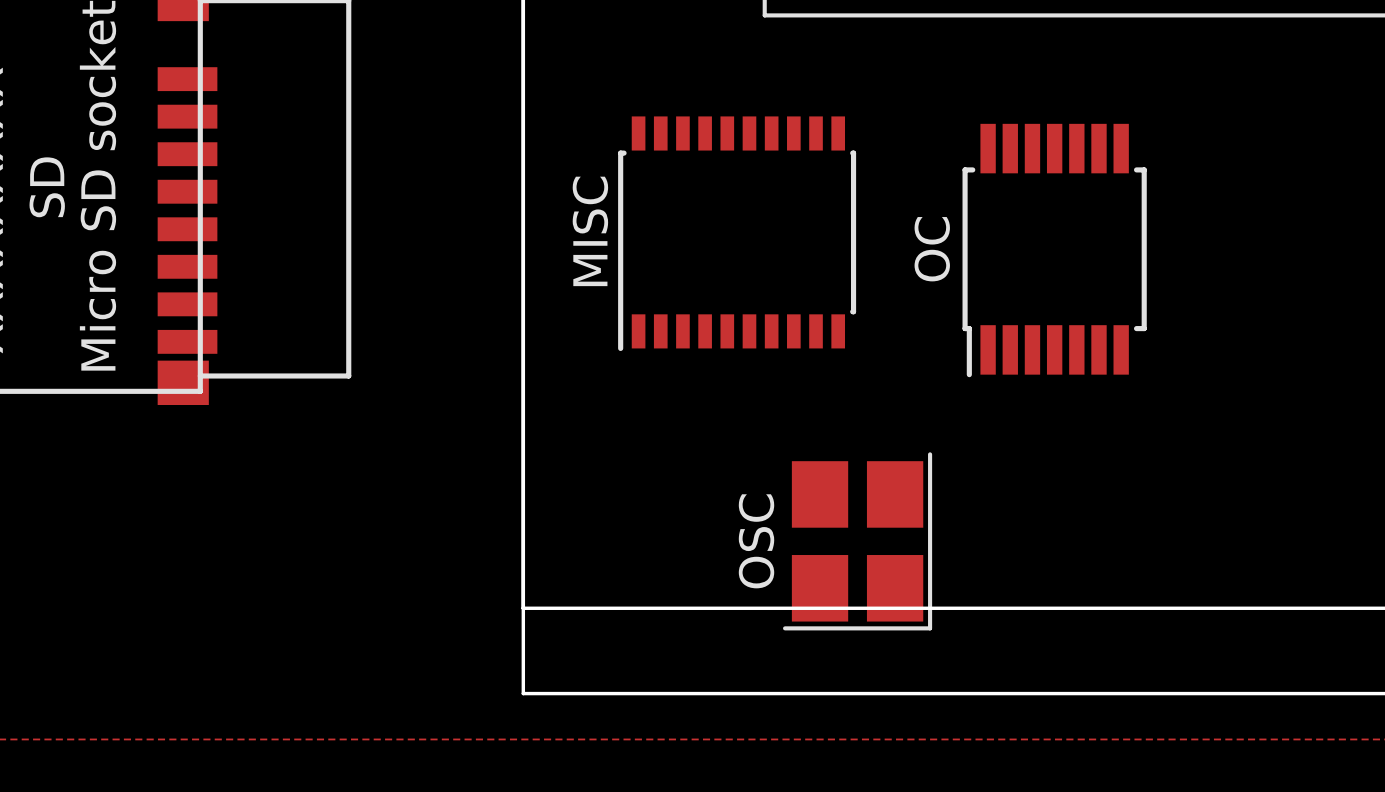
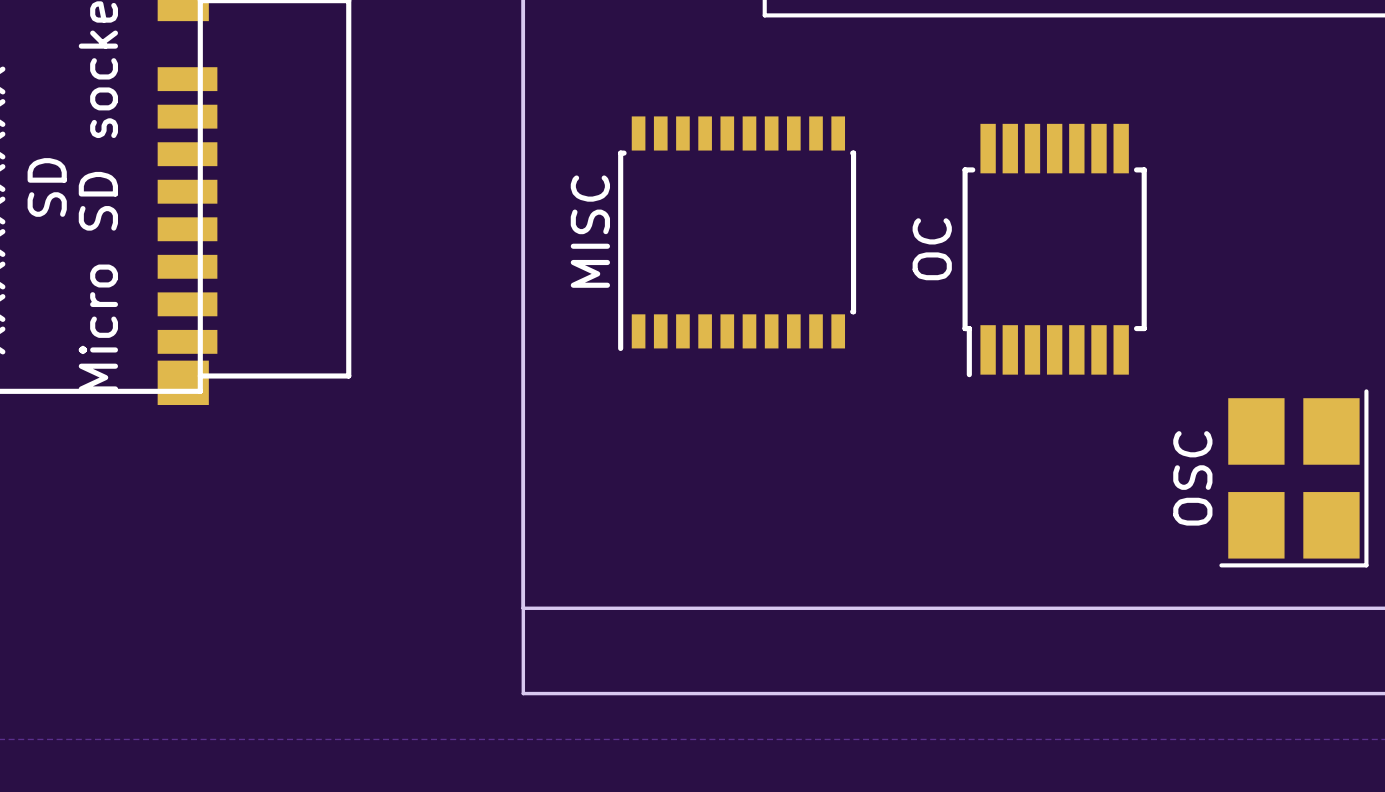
OSC position: (857, 541) -> (1293, 478)

